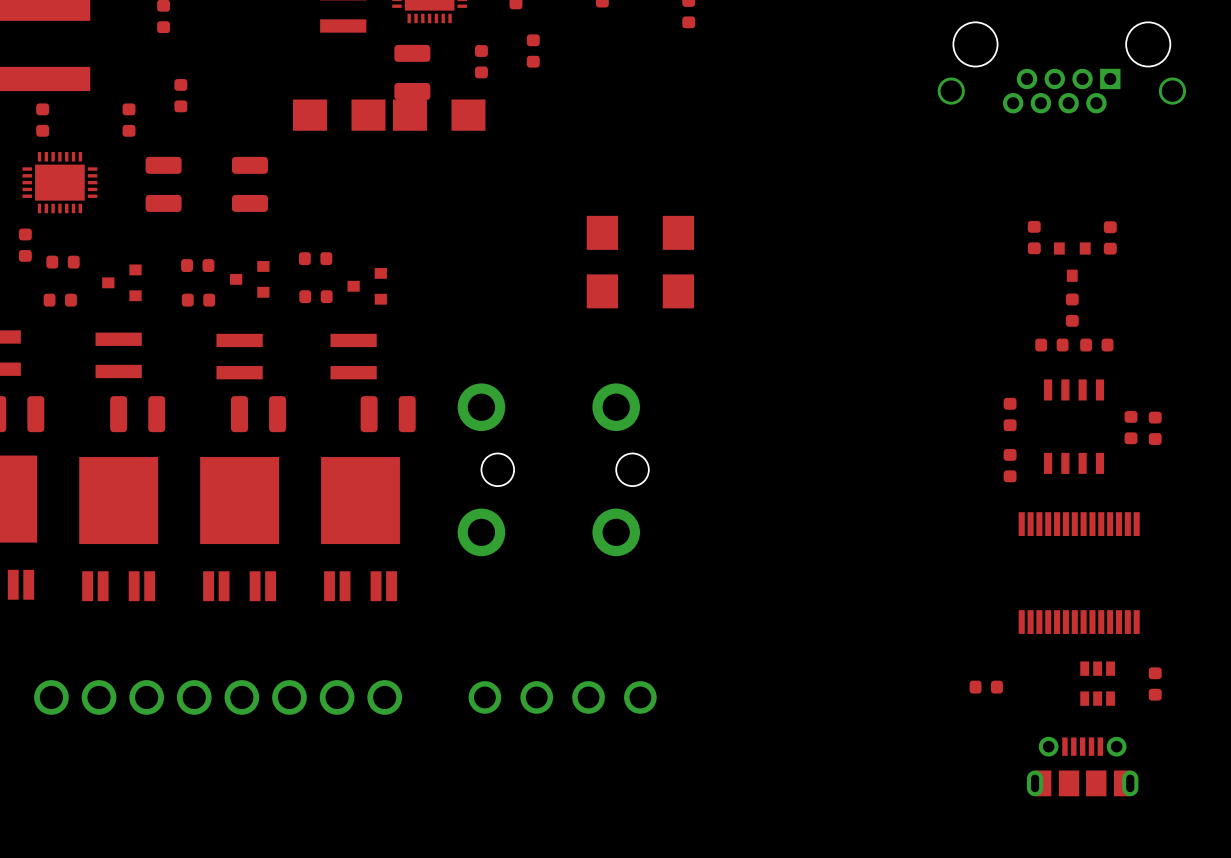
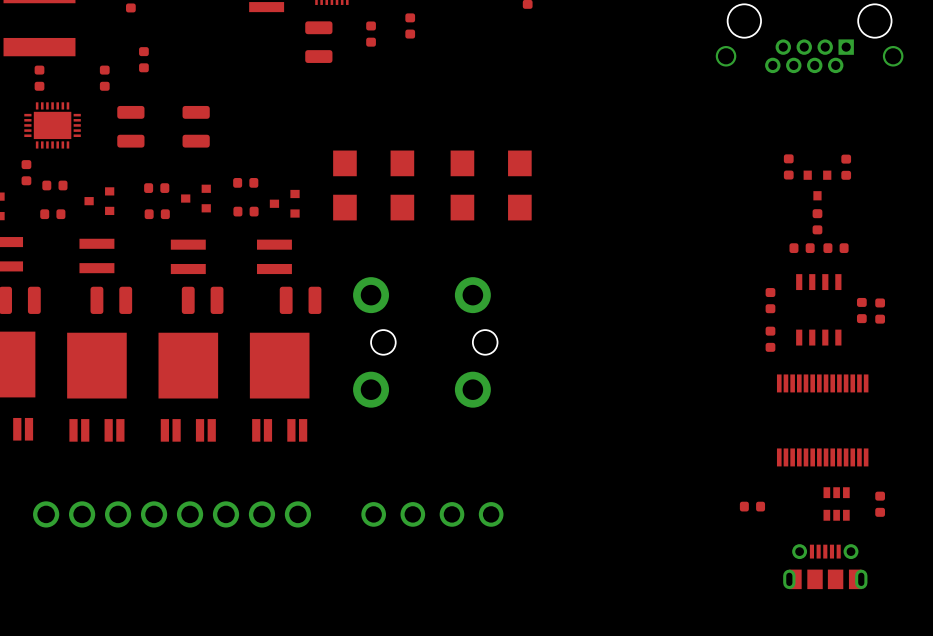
part: (339, 115) -> none
part: (439, 115) -> none
part: none -> (344, 185)
part: none -> (402, 185)

